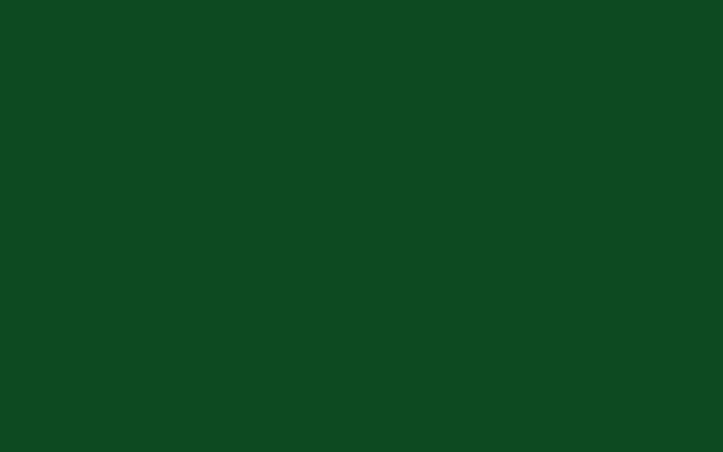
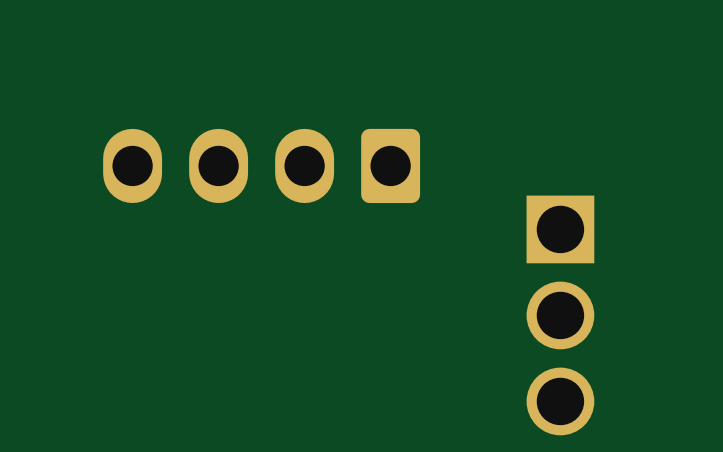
part: none -> (261, 165)
part: none -> (560, 315)

